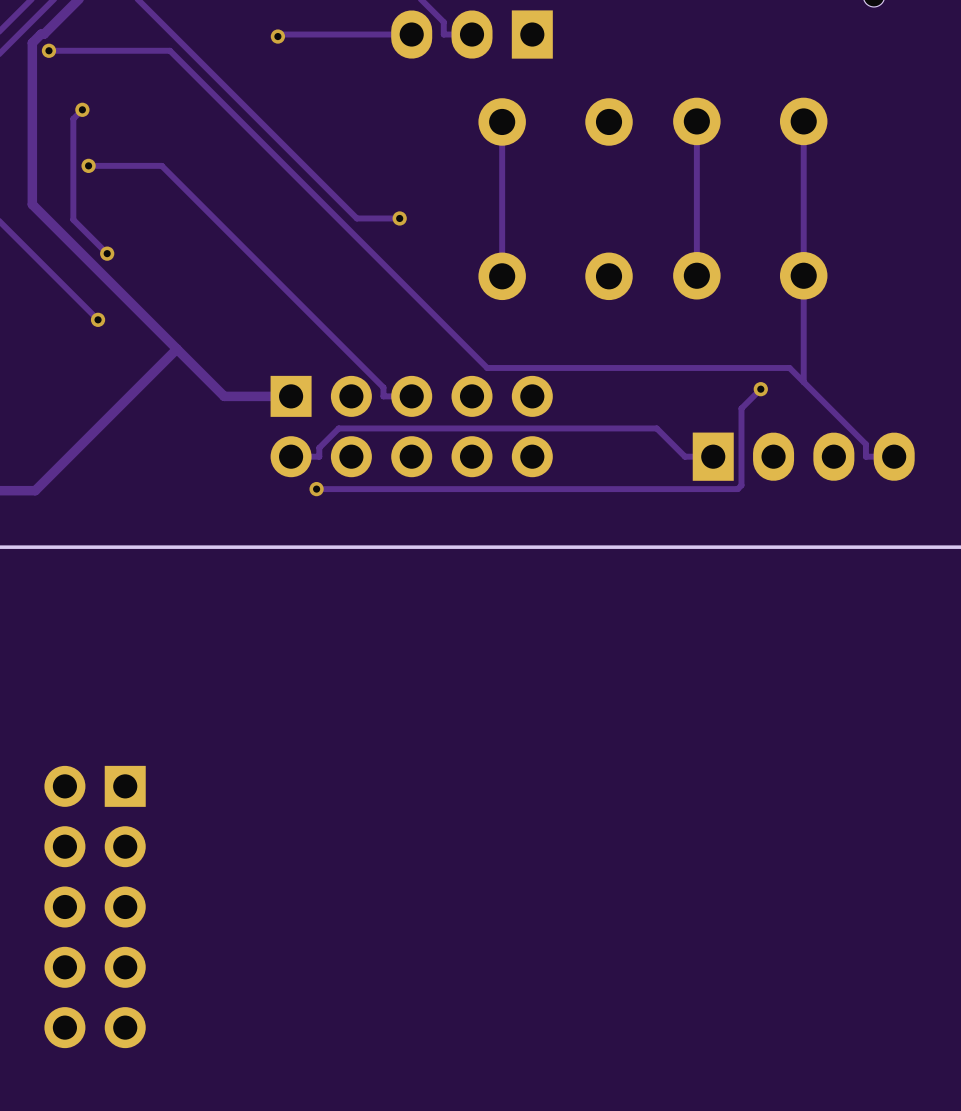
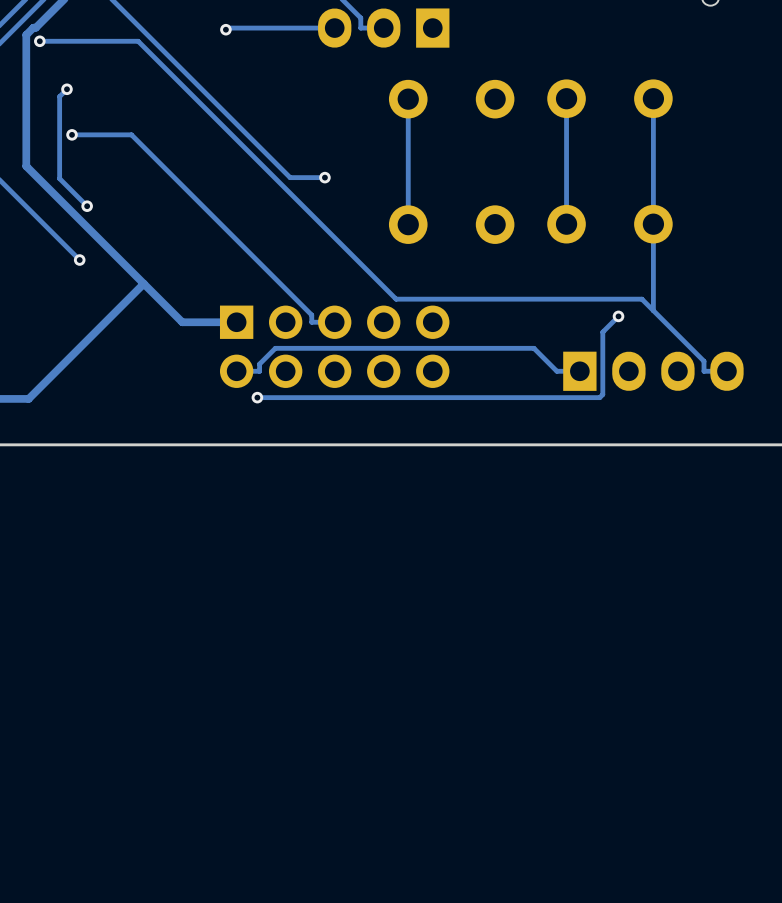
part: (95, 906) -> none

